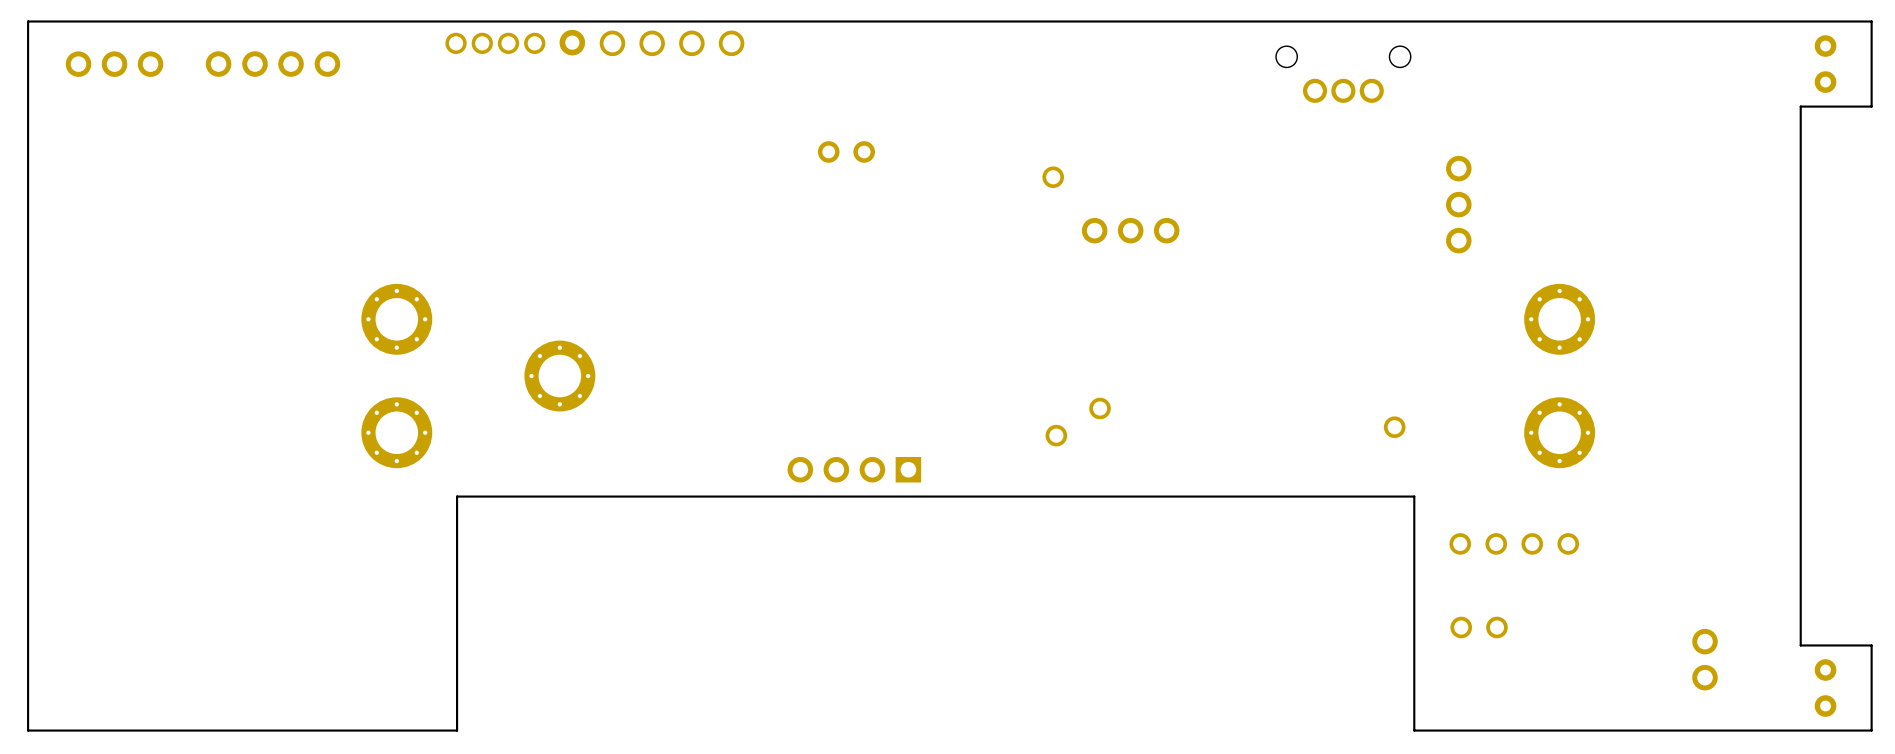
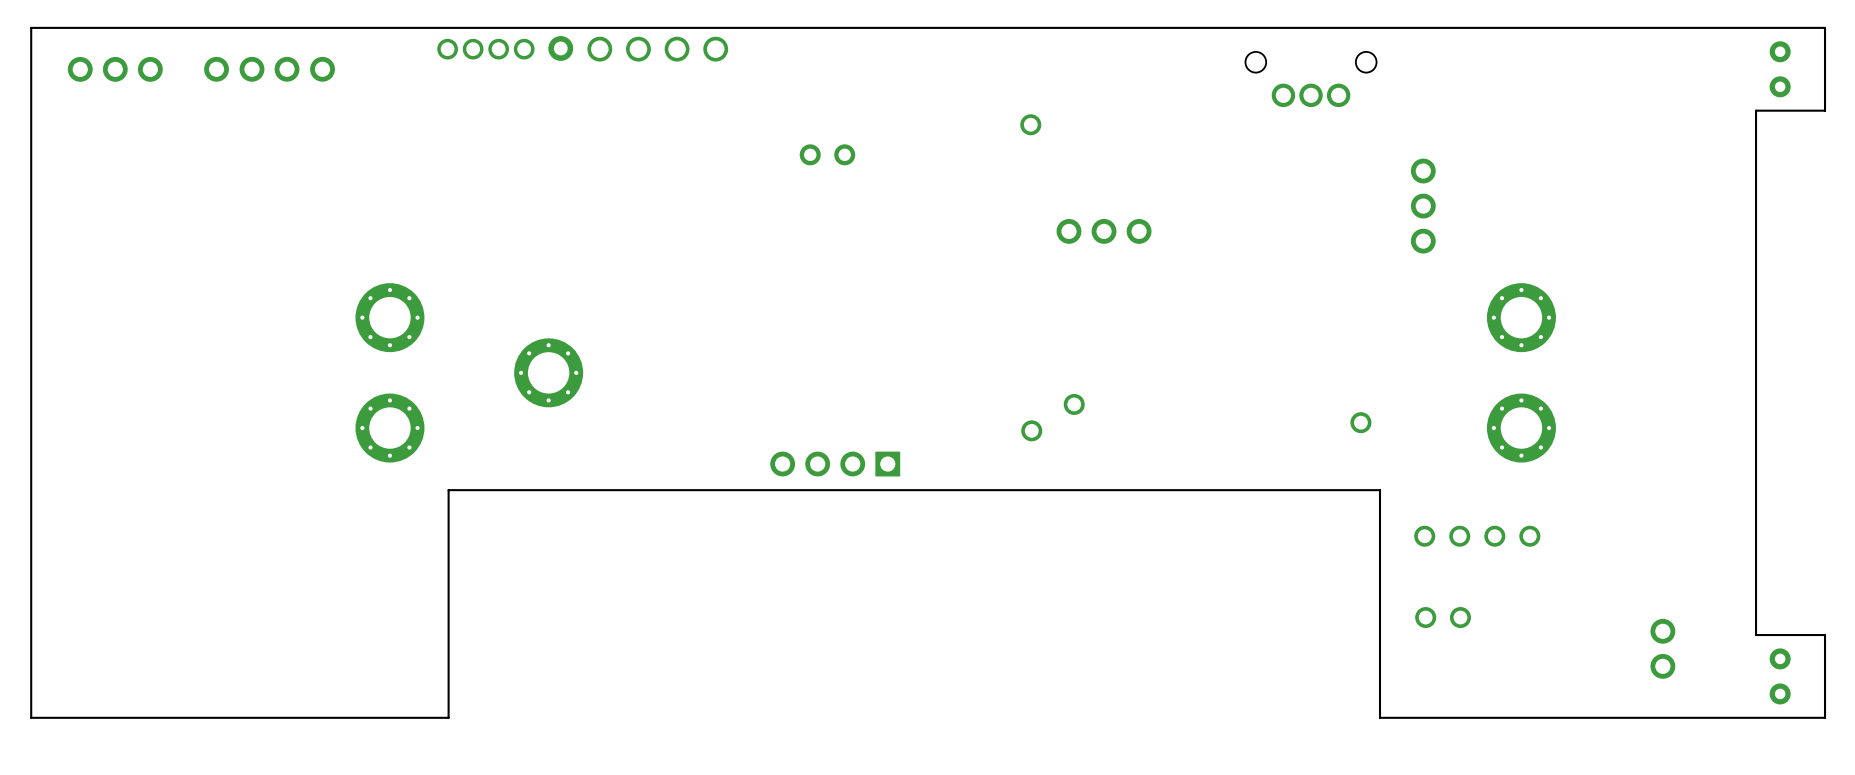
part position: (1053, 177) -> (1030, 124)

